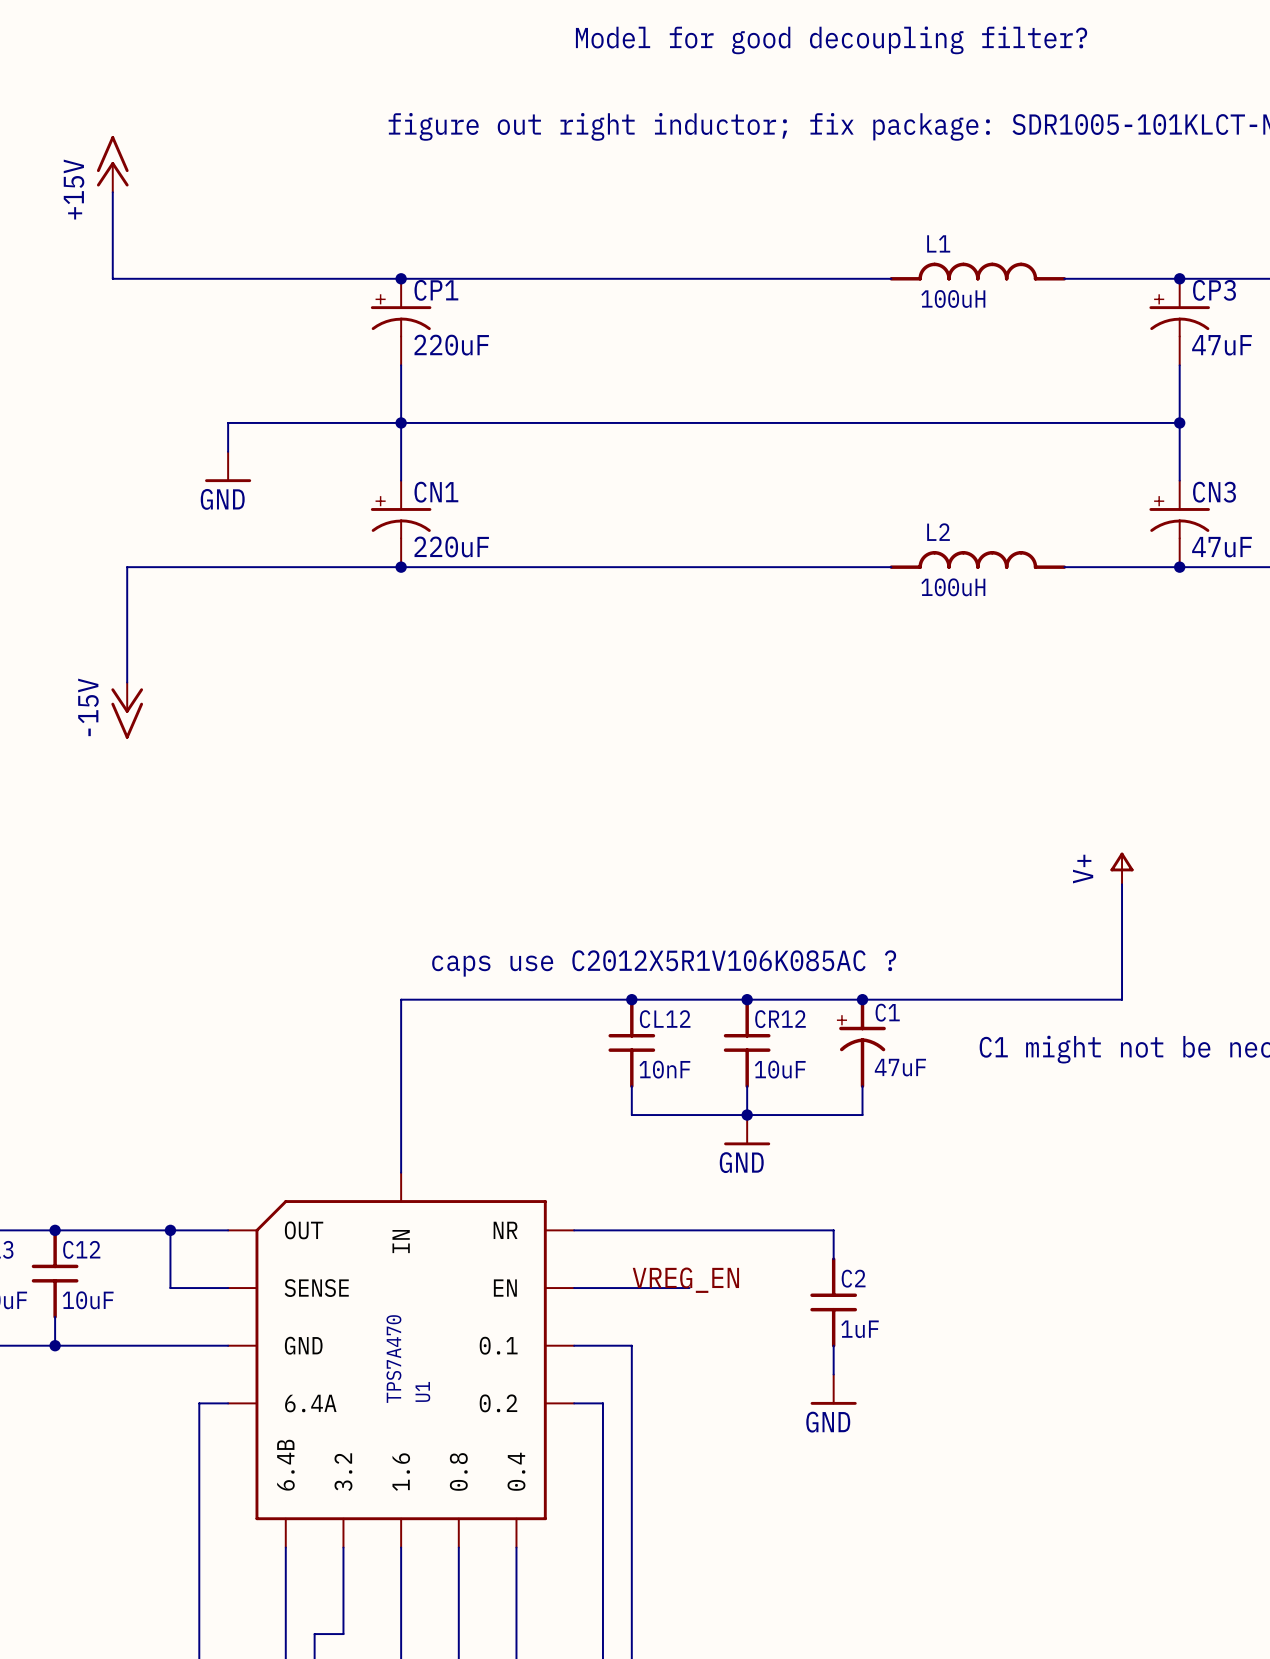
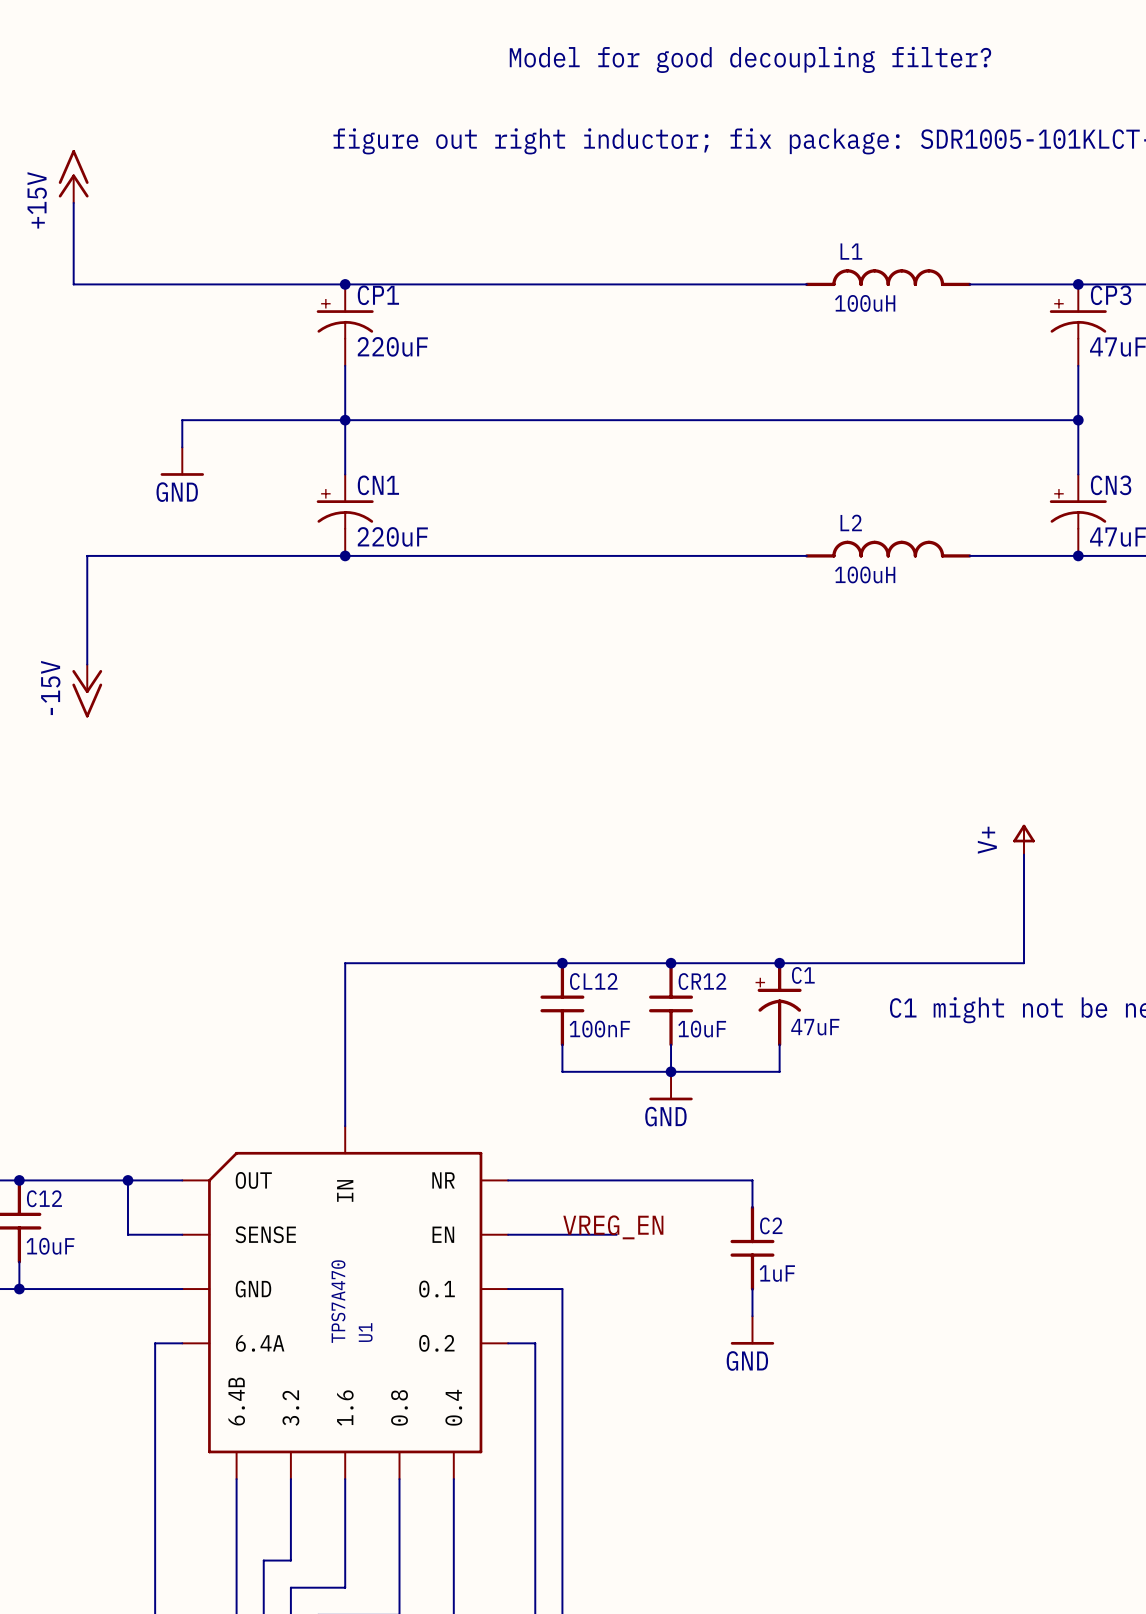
text: caps use C2012X5R1V106K085AC ? (664, 963) -> none
CL12 value: 10nF (664, 1069) -> 100nF (599, 1029)

